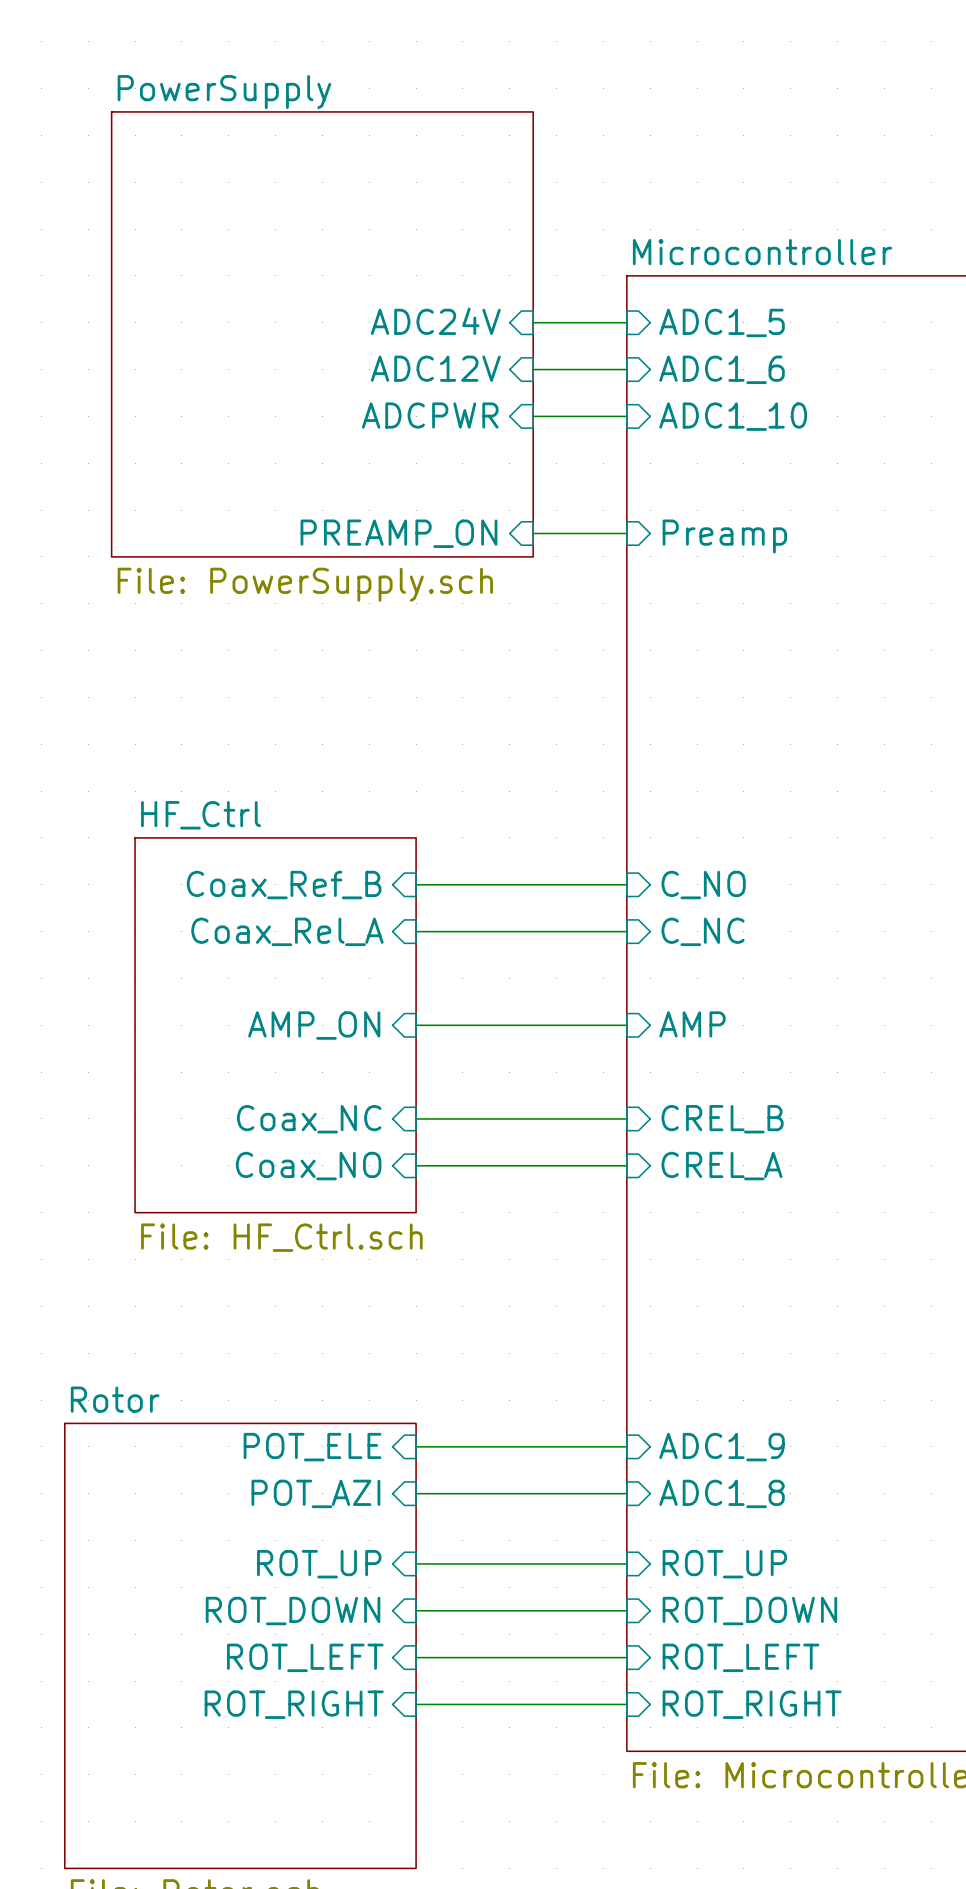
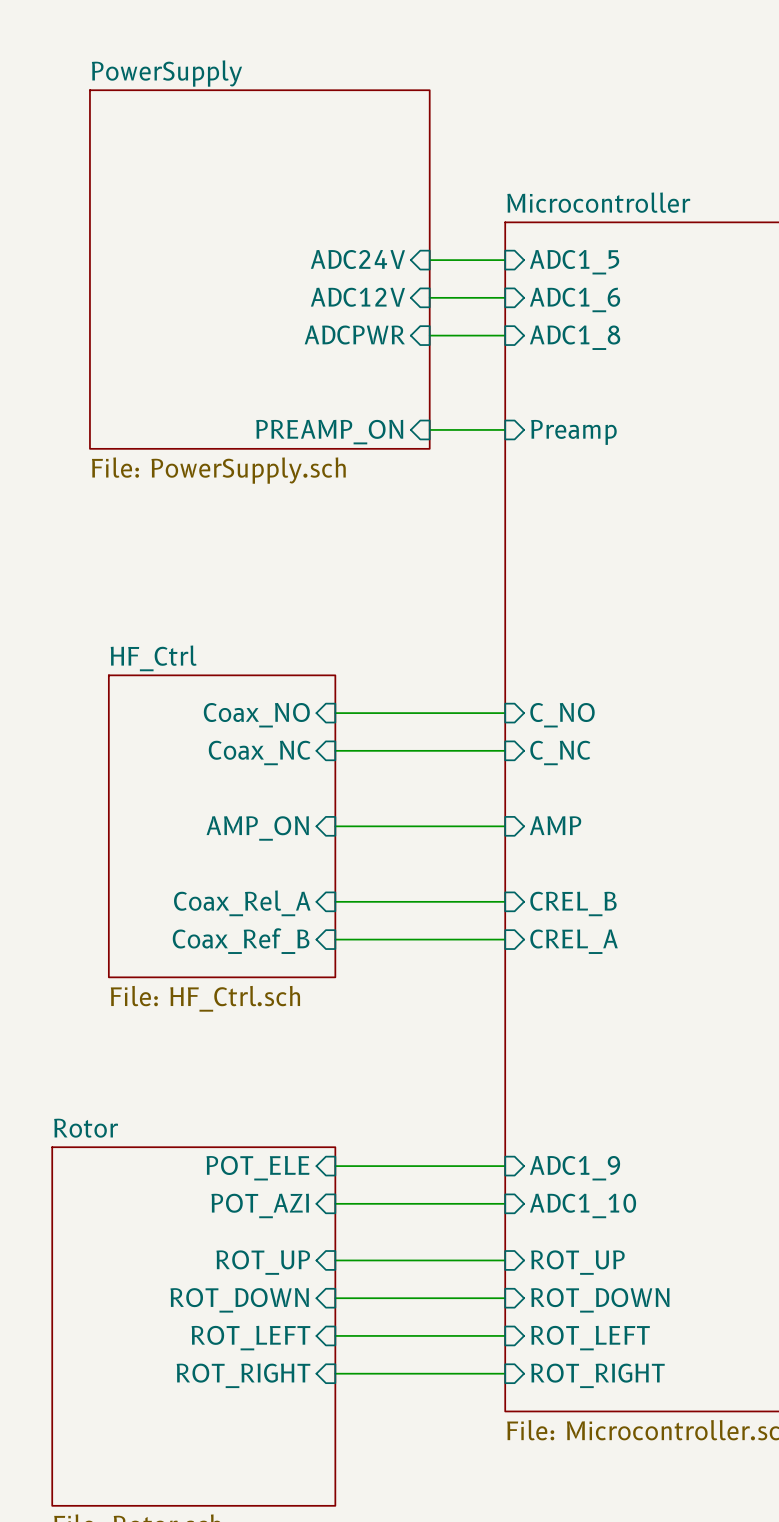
sheet pin: ADC1_10 (733, 416) -> ADC1_8 (575, 337)
sheet pin: Coax_Ref_B (284, 885) -> Coax_NO (256, 715)
sheet pin: Coax_Rel_A (287, 931) -> Coax_NC (259, 752)
sheet pin: Coax_NC (309, 1119) -> Coax_Rel_A (242, 903)
sheet pin: Coax_NO (308, 1166) -> Coax_Ref_B (241, 941)
sheet pin: ADC1_8 (722, 1493) -> ADC1_10 (583, 1205)

